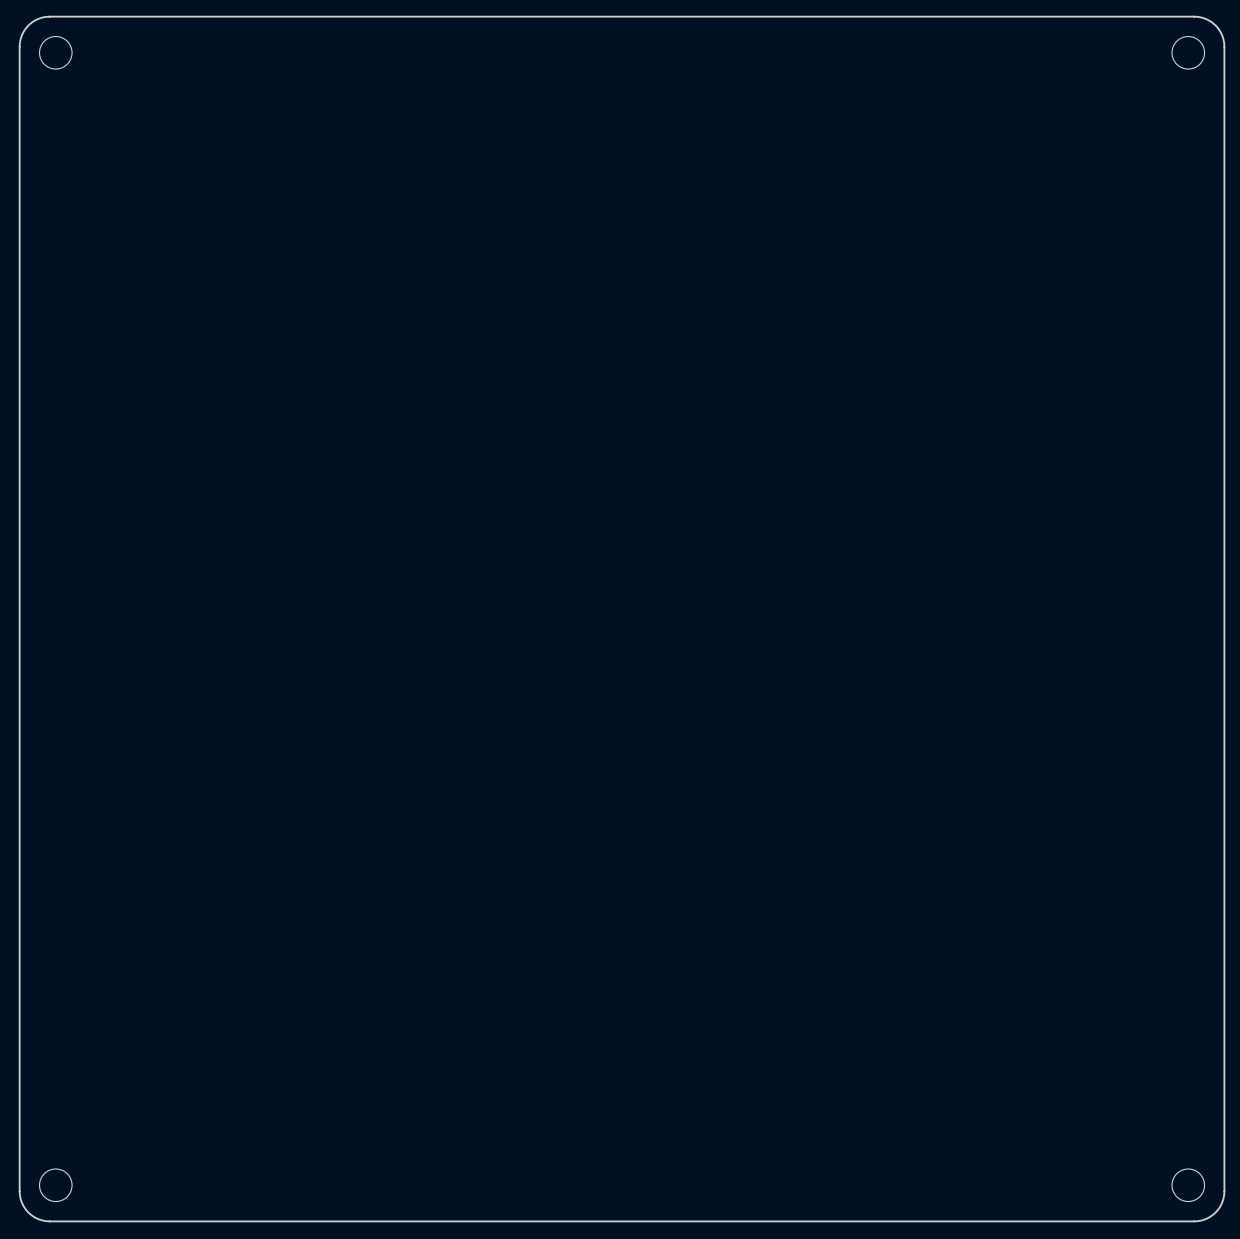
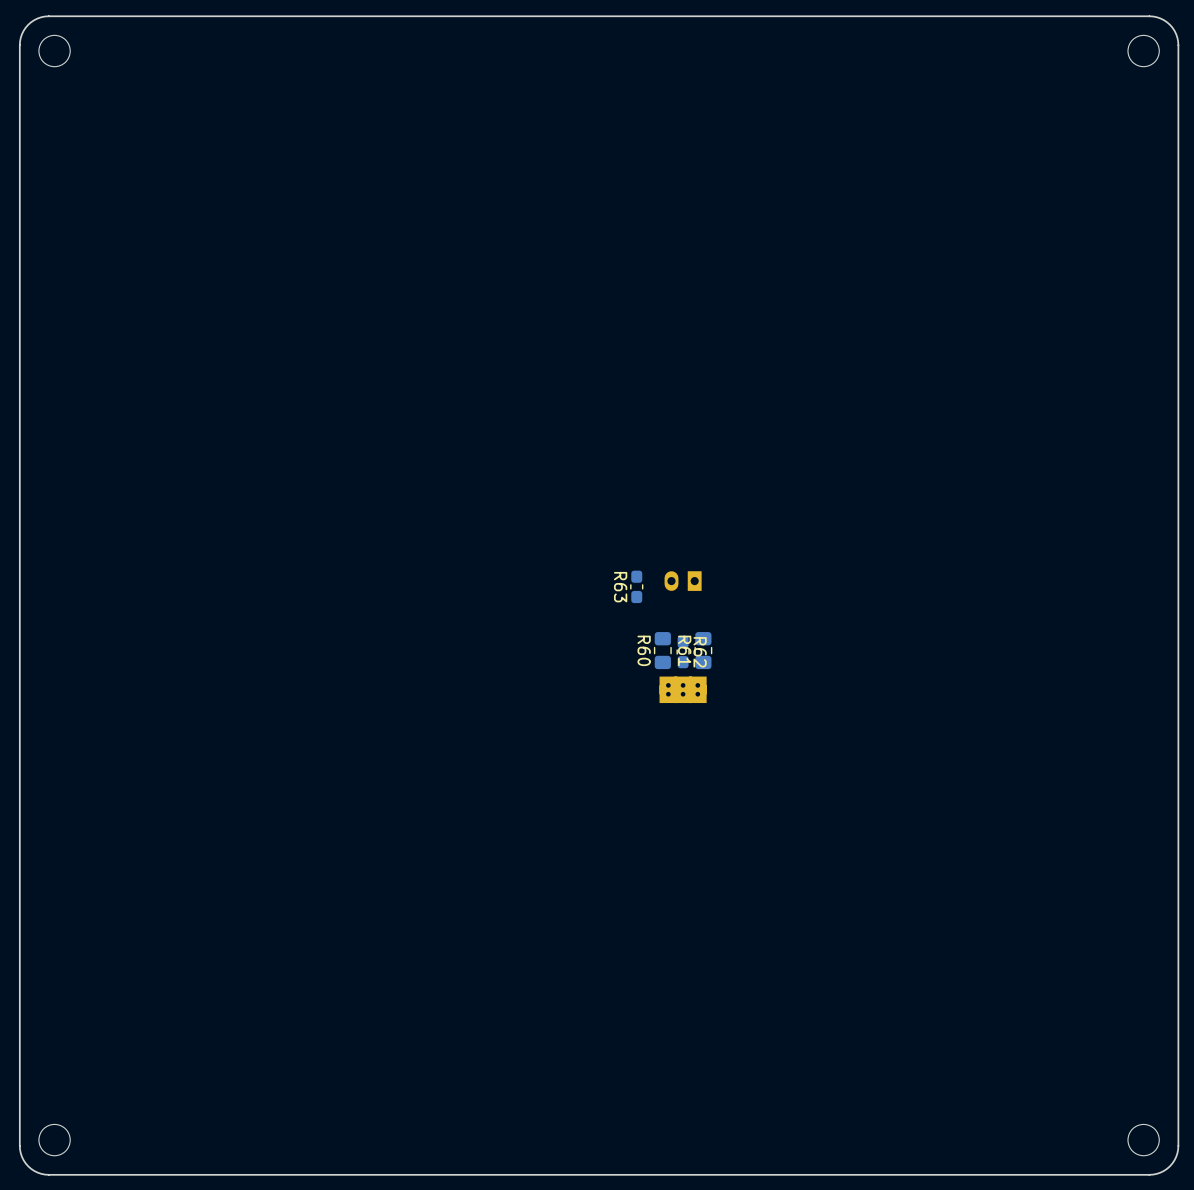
part: none -> (683, 581)
R63: none -> (636, 586)
R60: none -> (662, 650)
R61: none -> (703, 650)
R62: none -> (683, 652)
part: none -> (683, 689)

